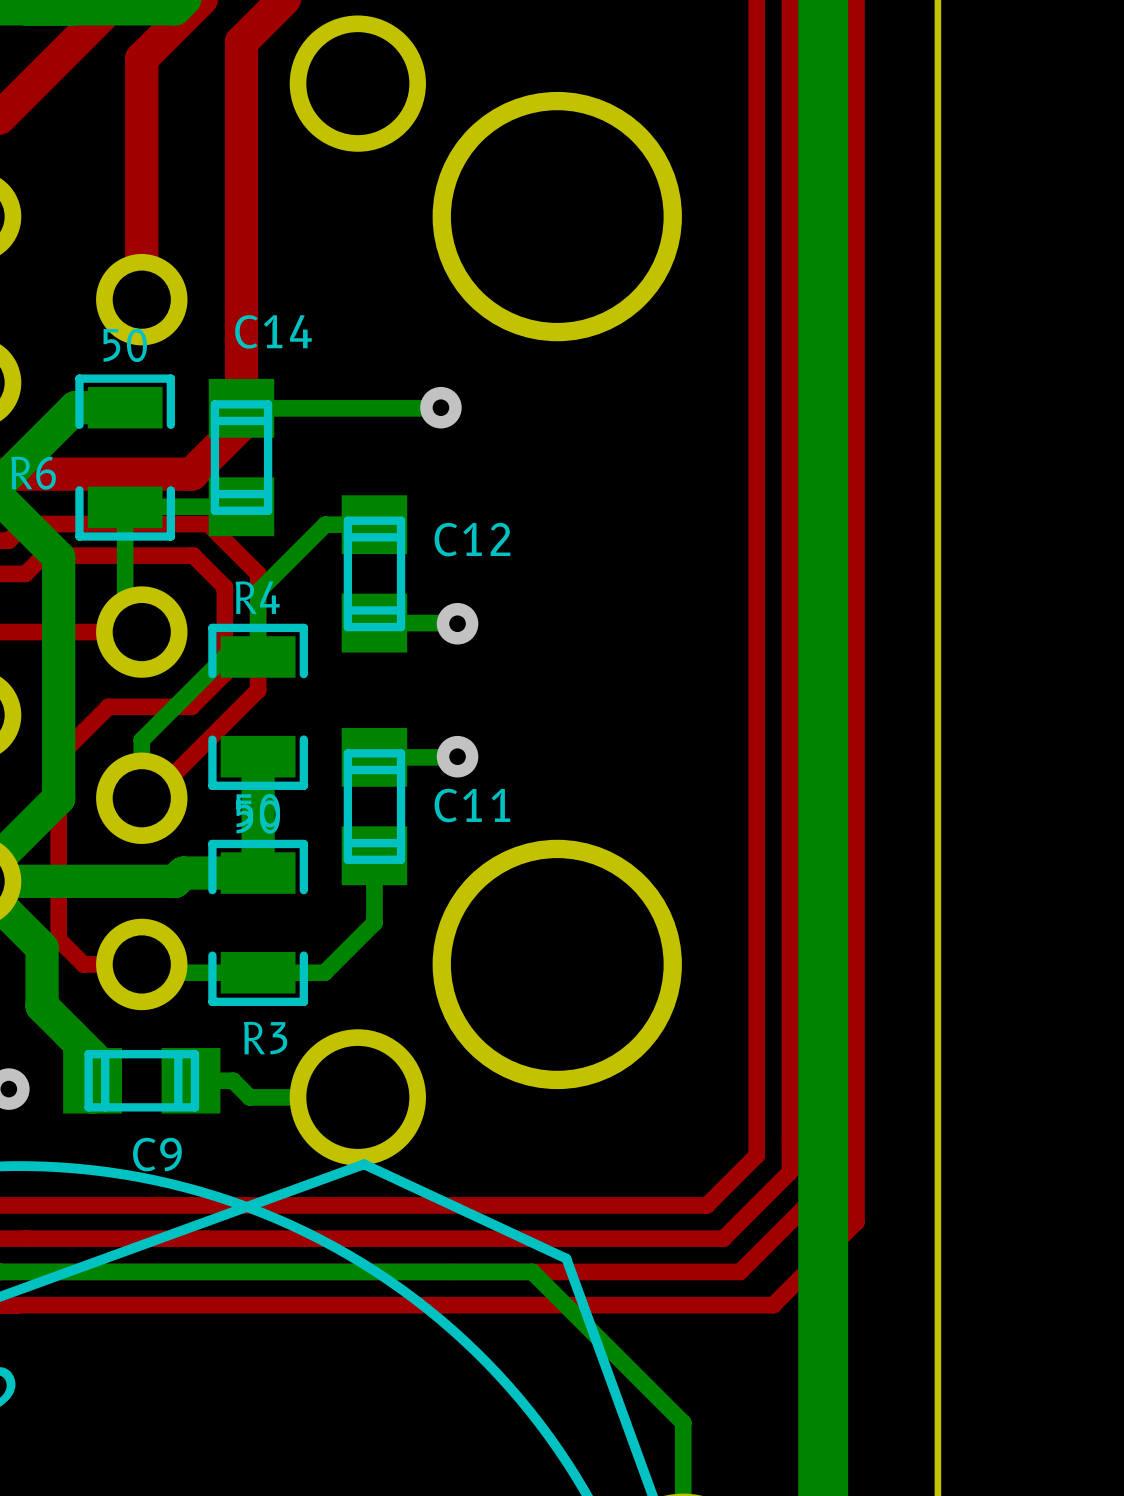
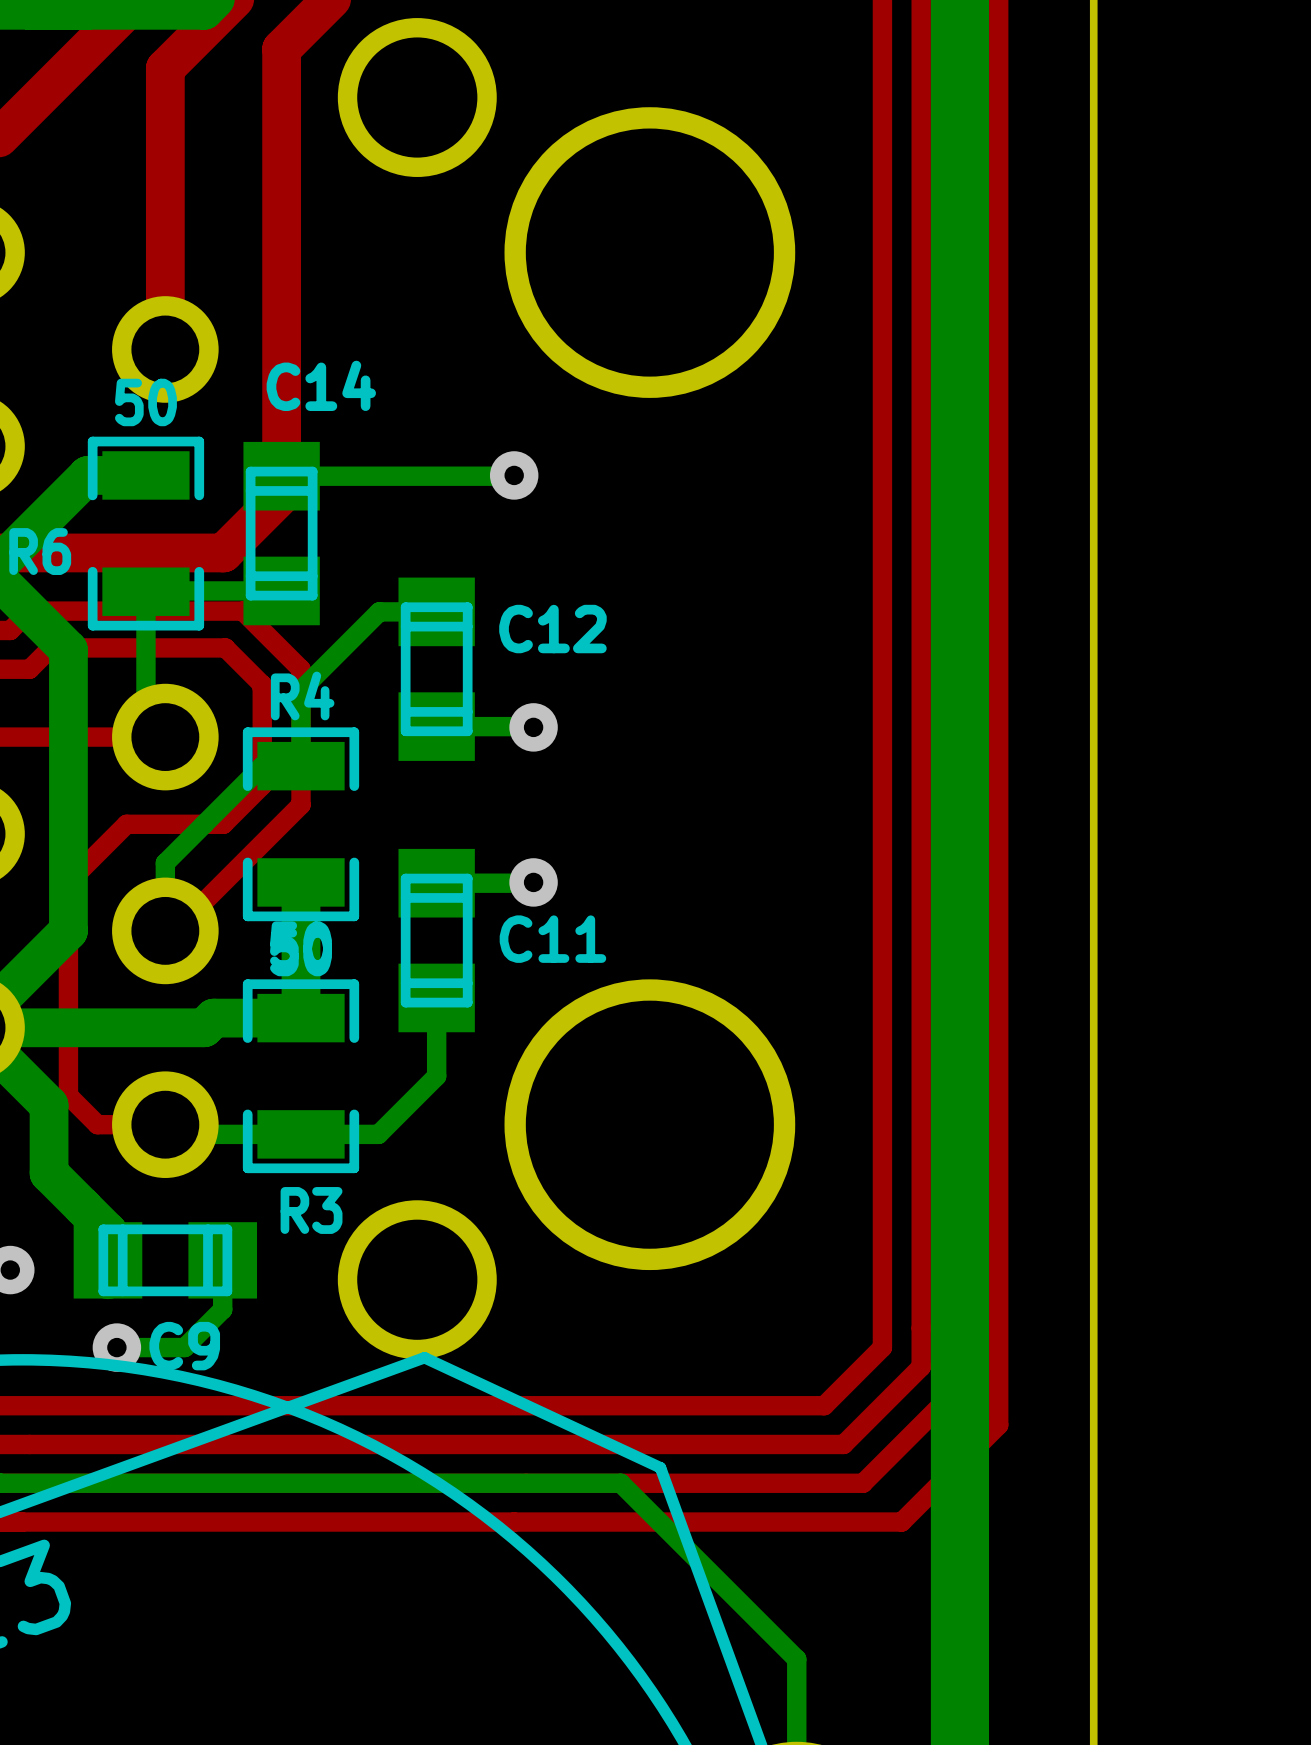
bottom track: (190, 1080) (233, 1080) (249, 1097) (357, 1097) -> (222, 1260) (222, 1309) (184, 1347) (116, 1347)
via: none -> (116, 1347)

